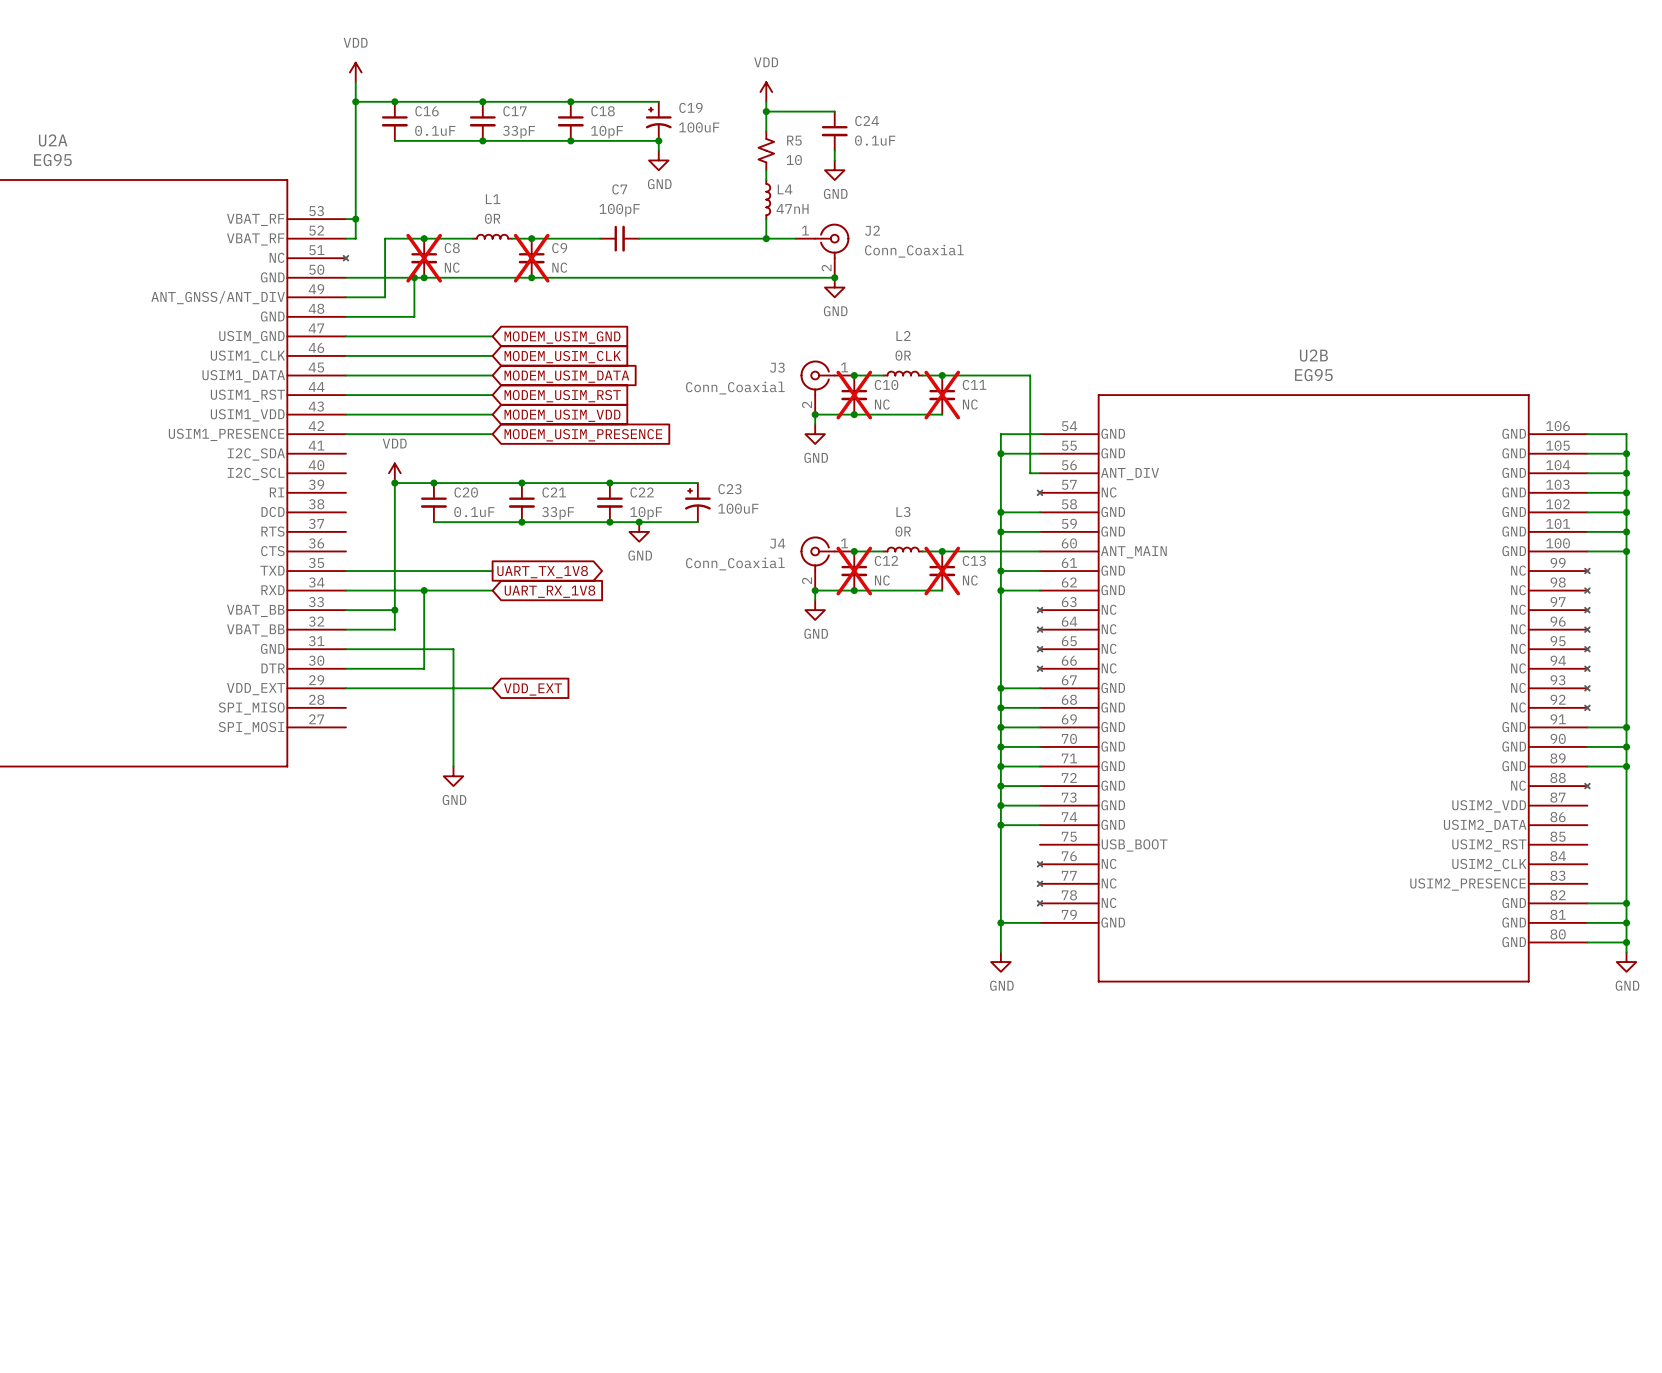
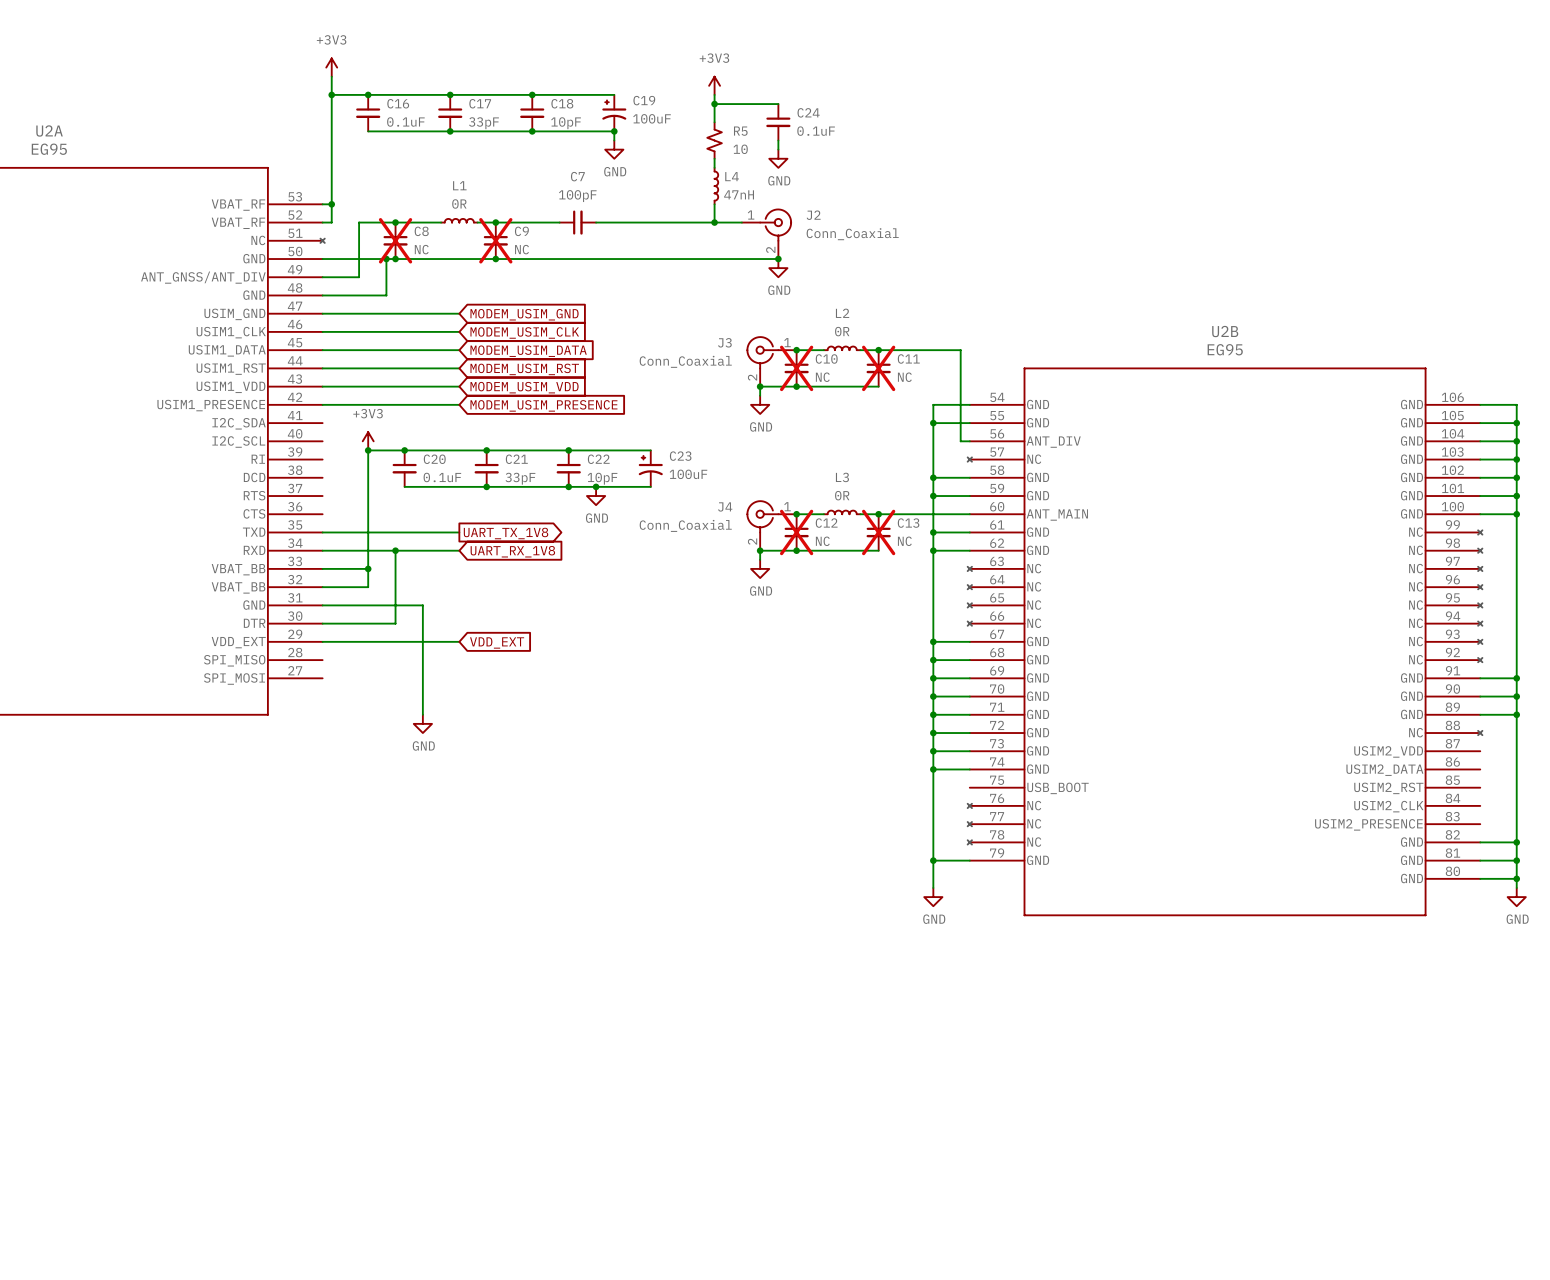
power symbol: VDD (355, 72) -> +3V3 (331, 67)
power symbol: VDD (766, 92) -> +3V3 (714, 85)
power symbol: VDD (394, 473) -> +3V3 (368, 441)

